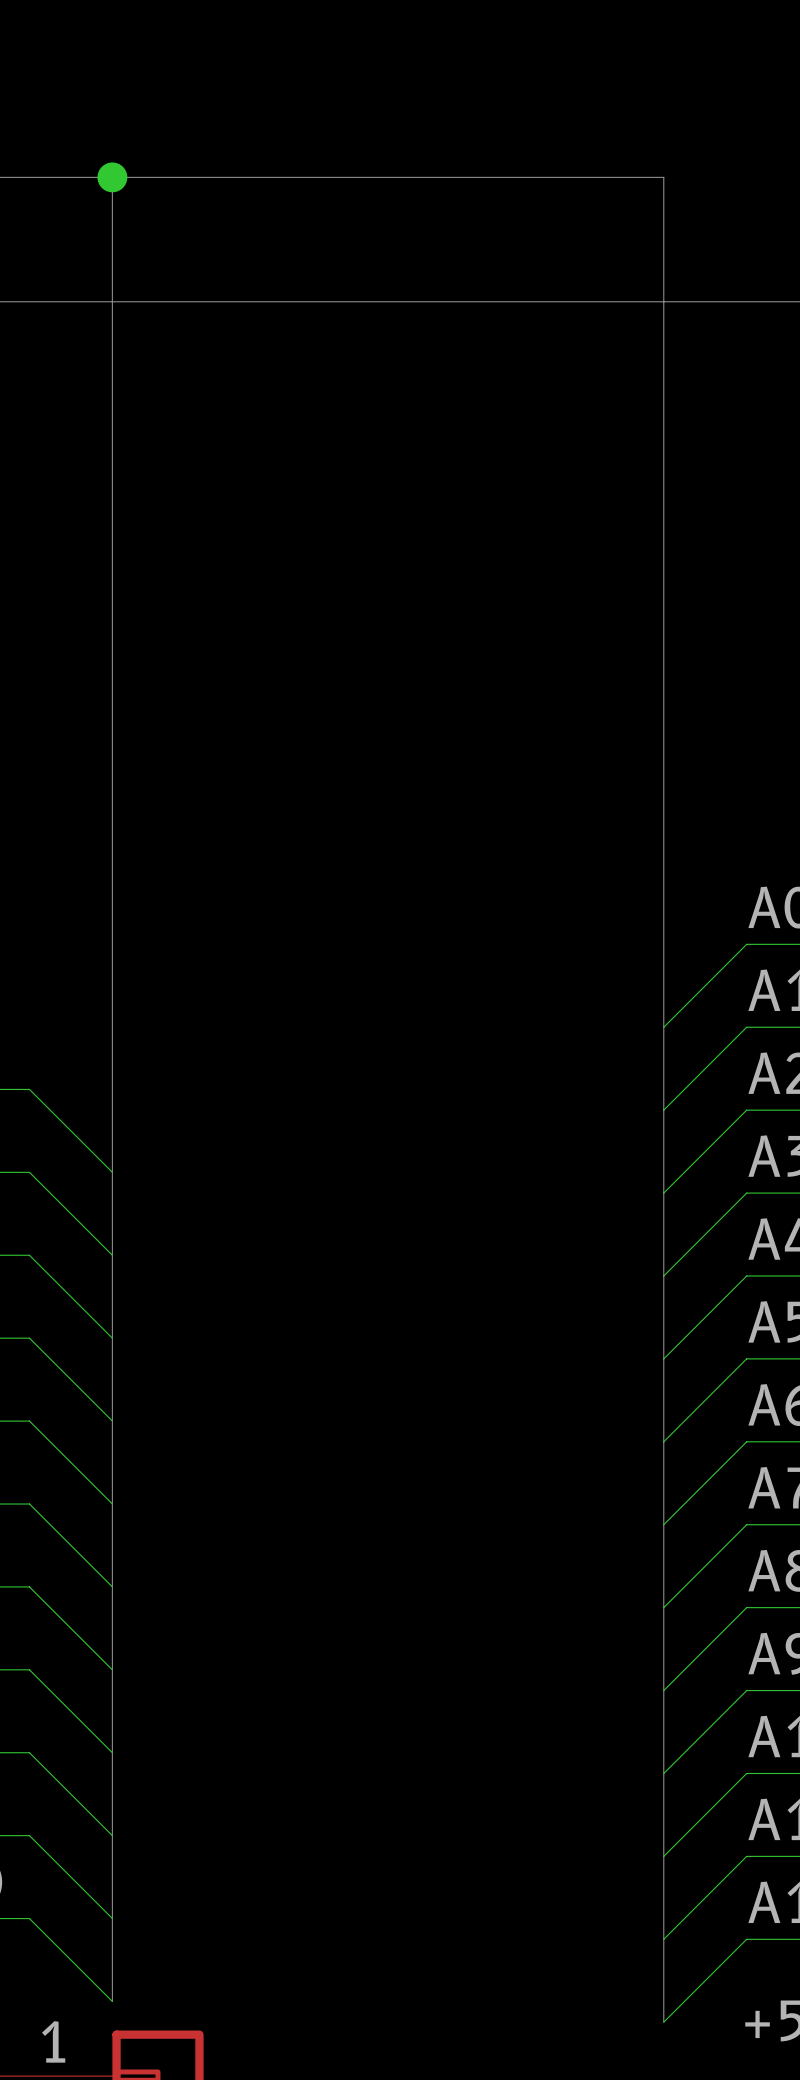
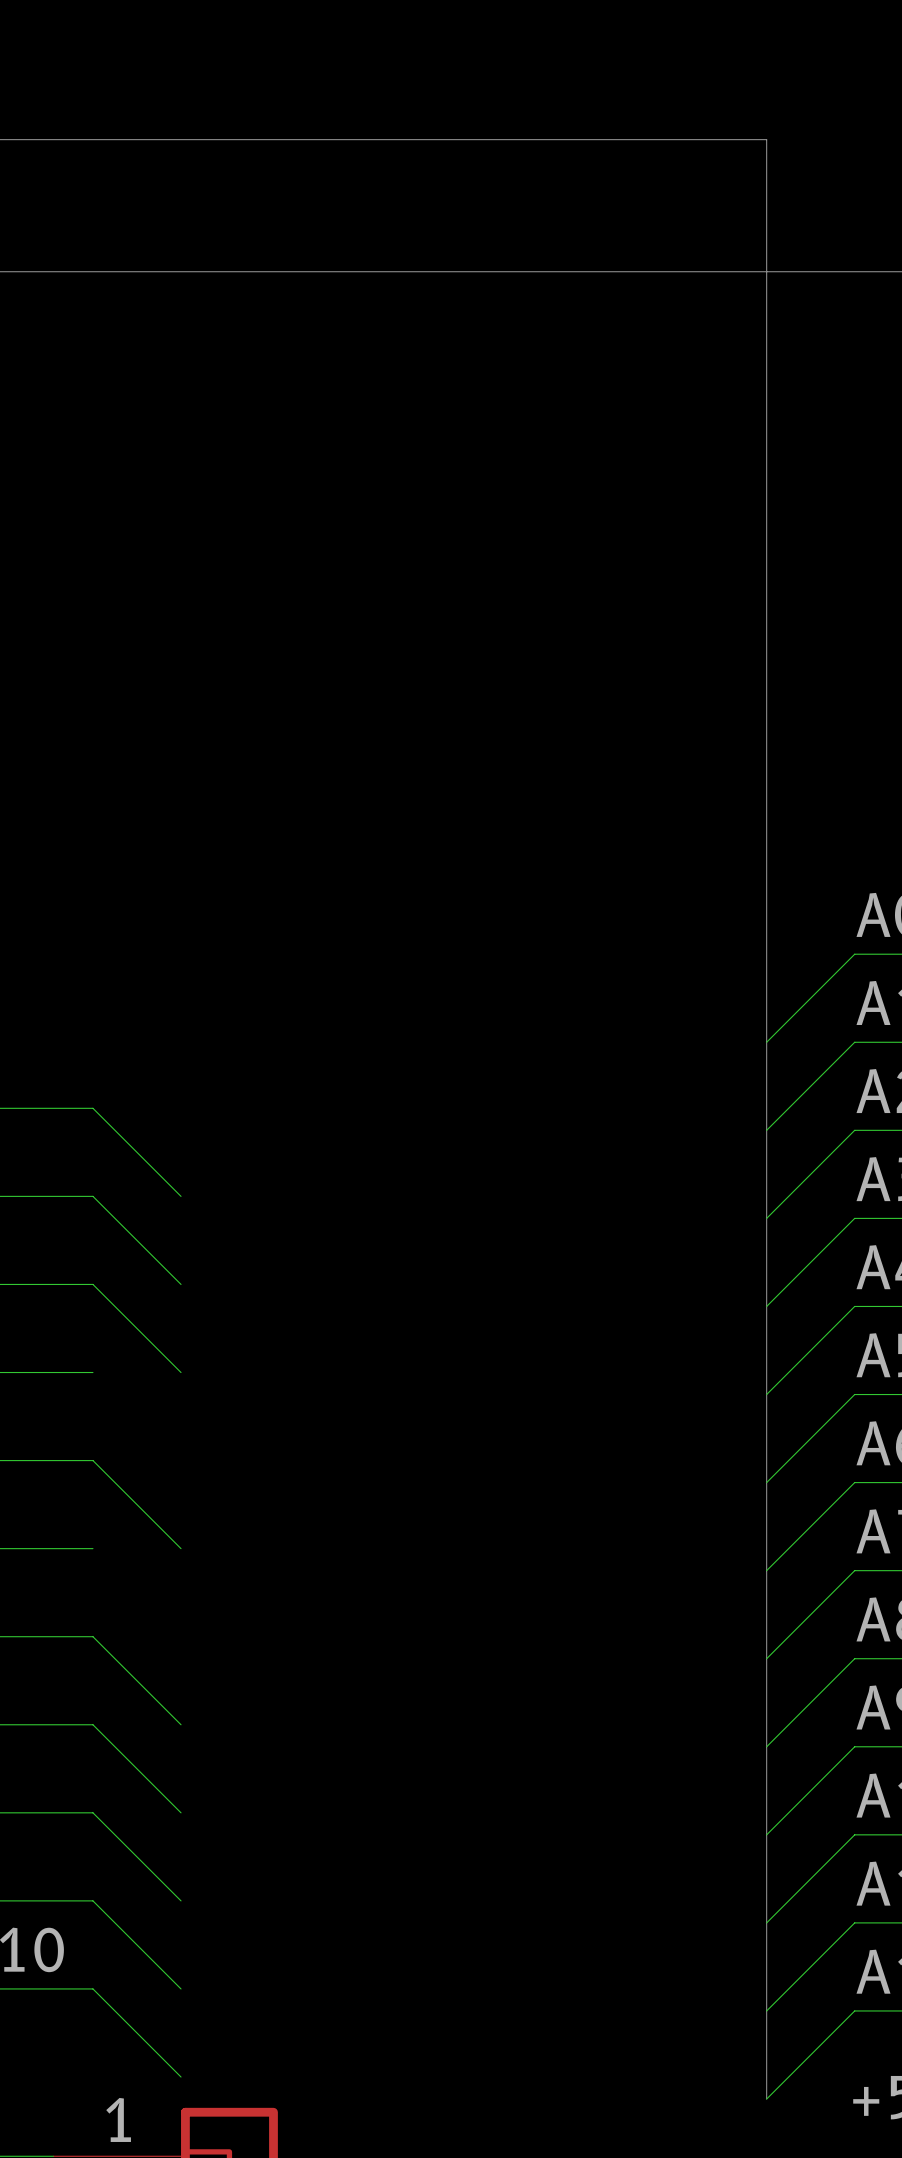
bus: (112, 177) (112, 2001) -> none
junction: (112, 177) -> none
wire: (29, 1338) (112, 1421) -> none
wire: (29, 1504) (112, 1586) -> none

